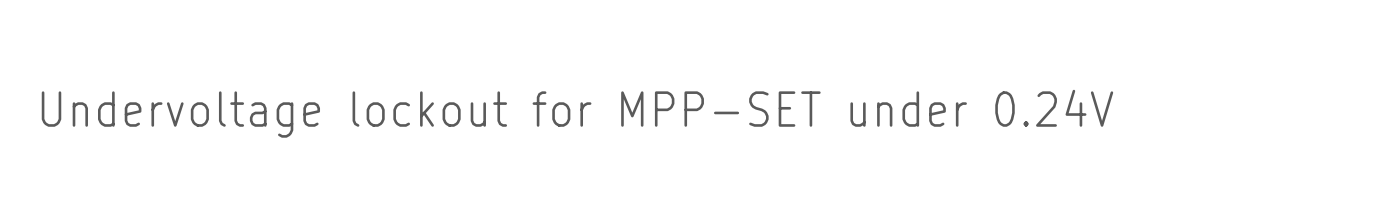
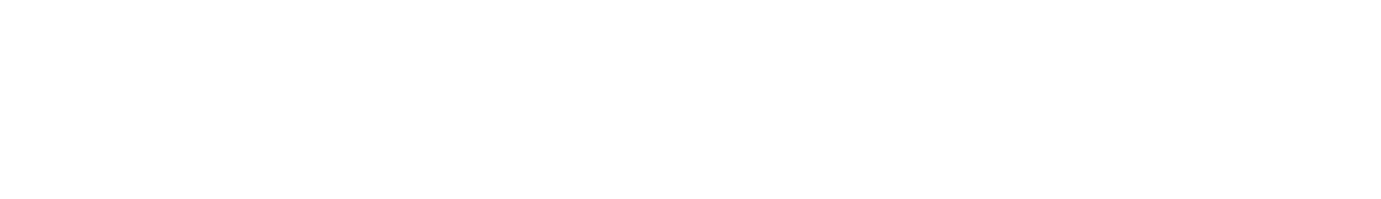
text: Undervoltage lockout for MPP-SET under 0.24V (577, 113) -> none

